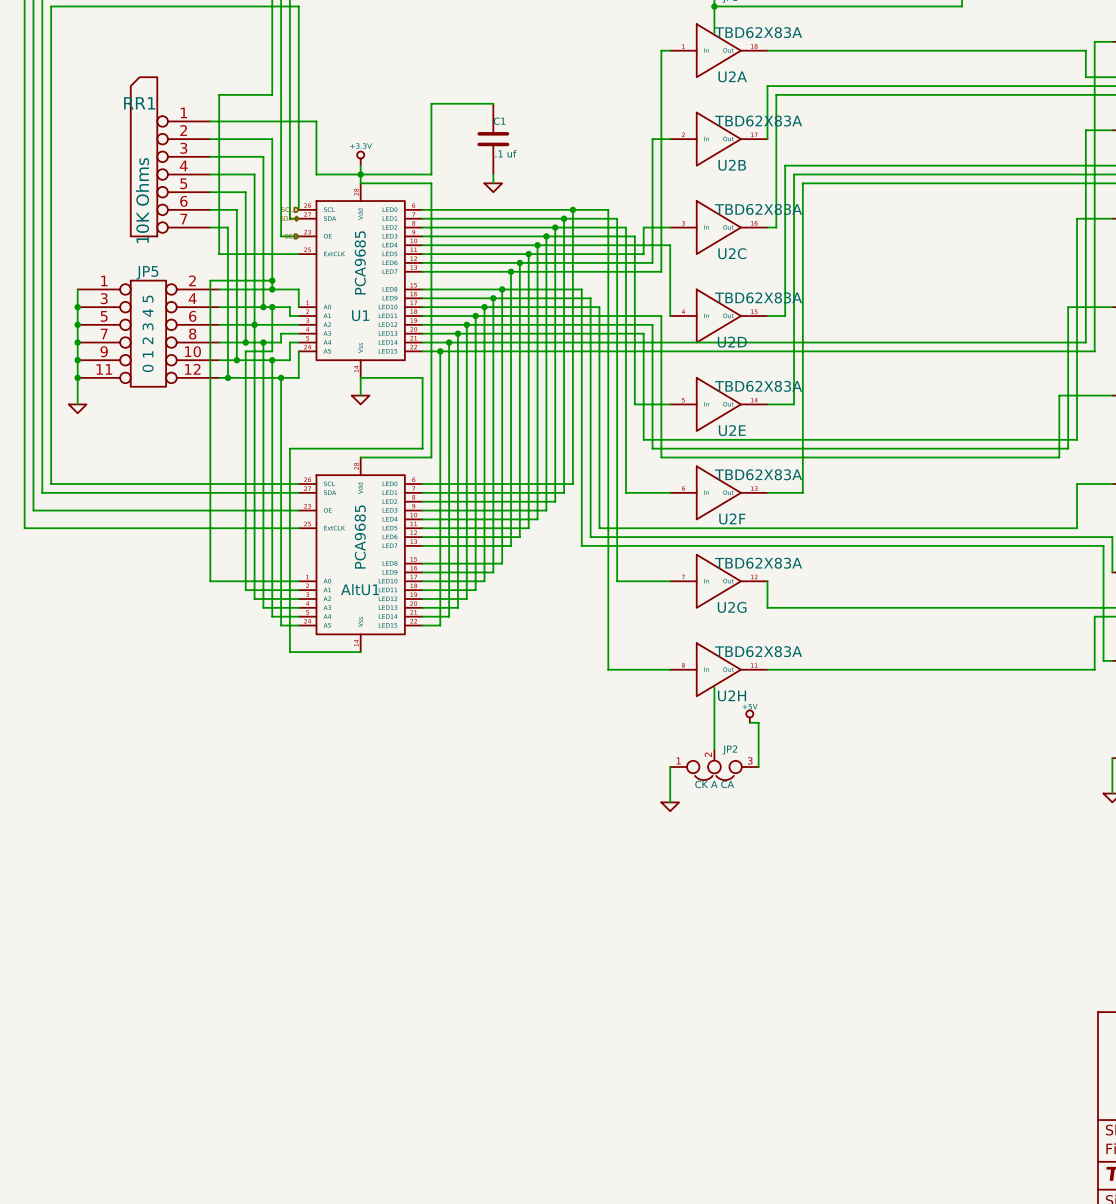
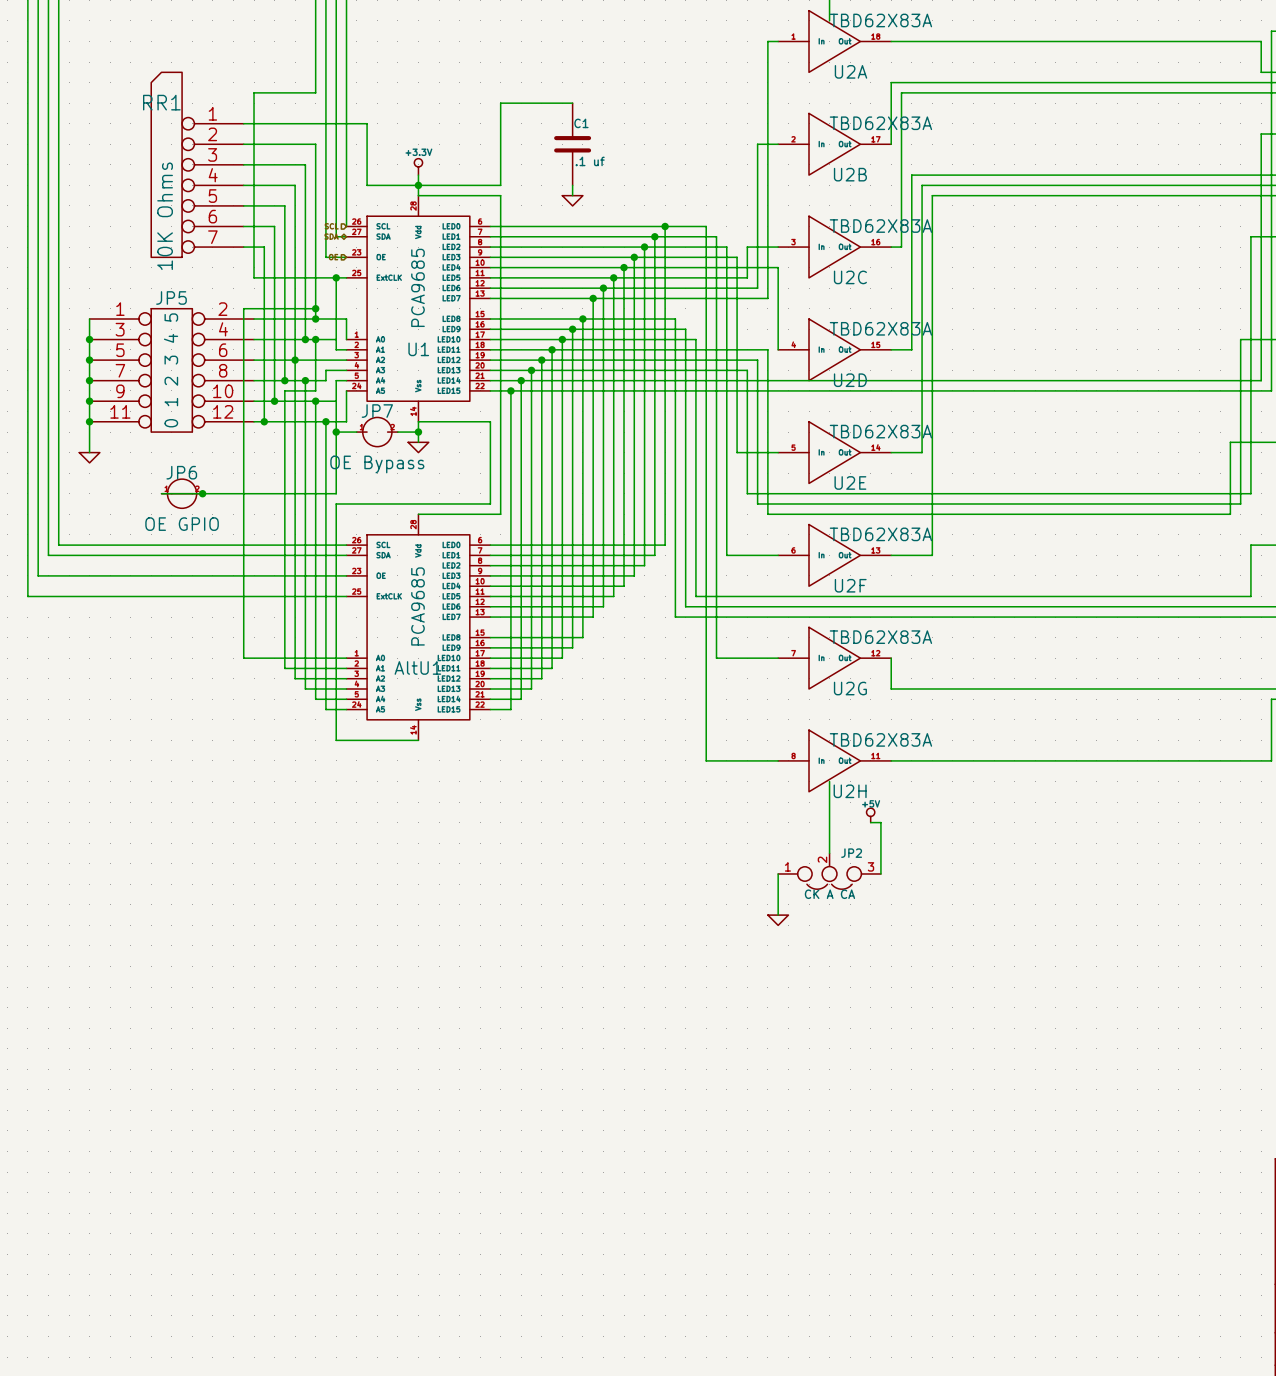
wire: none -> (336, 277) (336, 339)
junction: none -> (336, 277)
wire: none -> (336, 401) (336, 493) (161, 493)
wire: none -> (336, 432) (356, 432)
junction: none -> (336, 432)
JP7: none -> OE Bypass (377, 432)
wire: none -> (397, 432) (418, 432)
junction: none -> (418, 432)
JP6: none -> OE GPIO (182, 493)
junction: none -> (202, 493)

